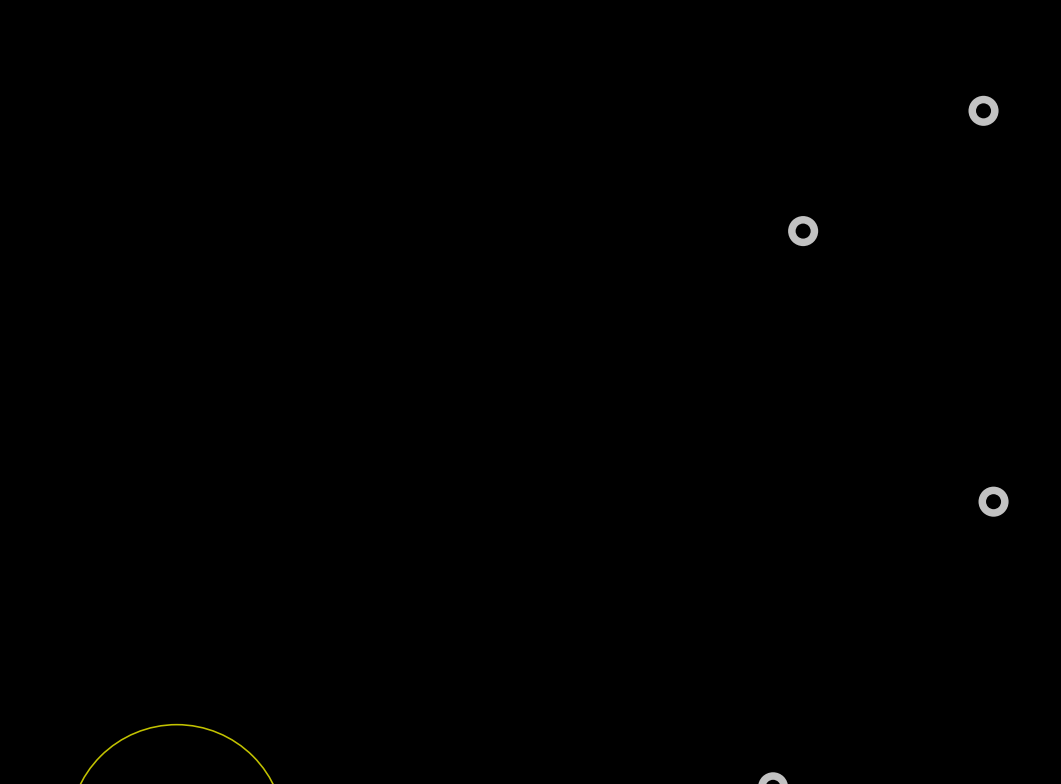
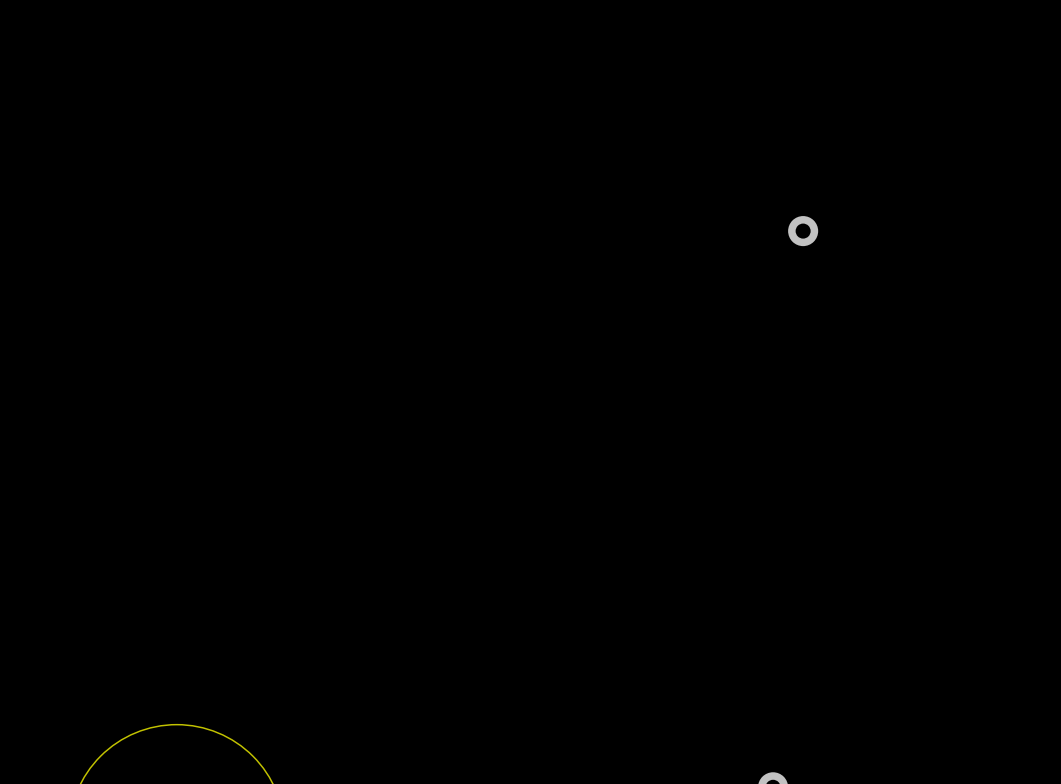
via: (983, 110) -> none
via: (993, 501) -> none

